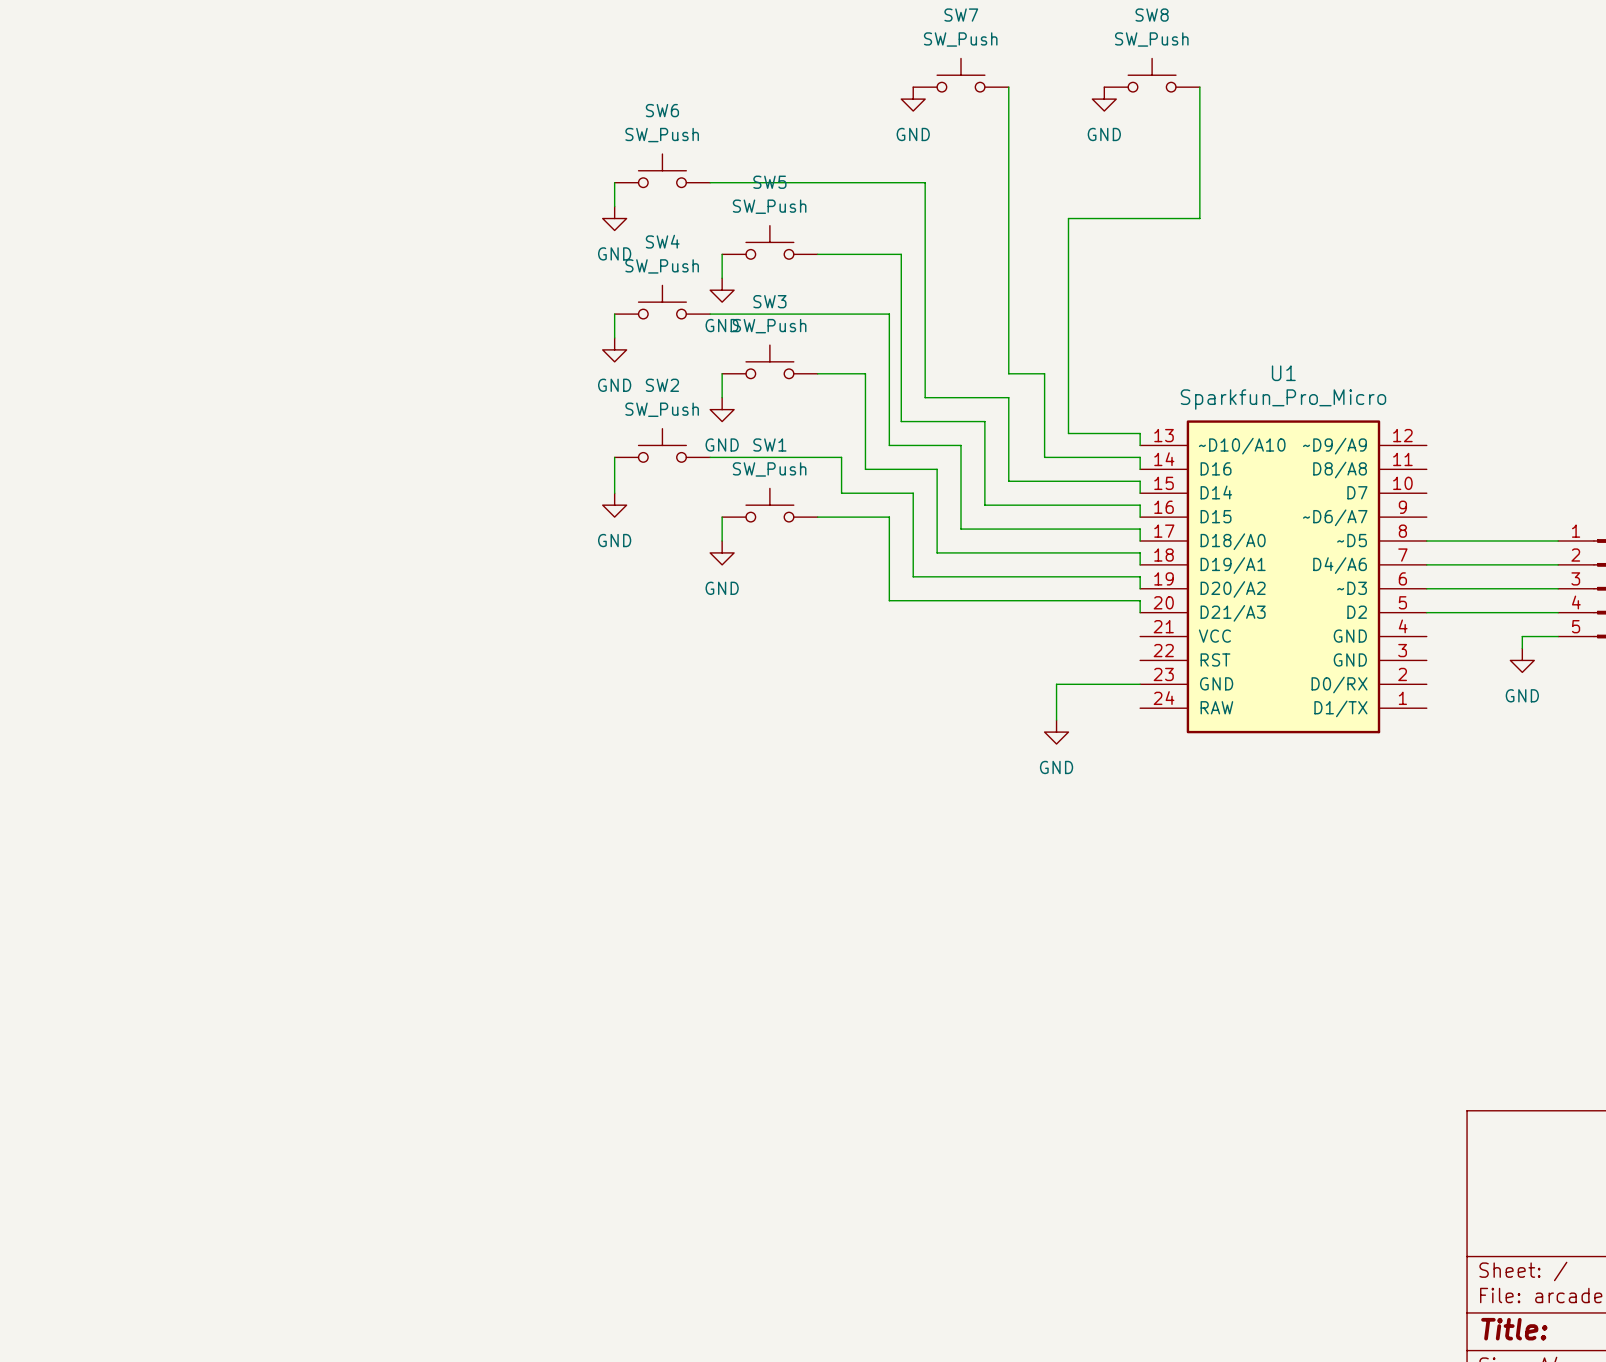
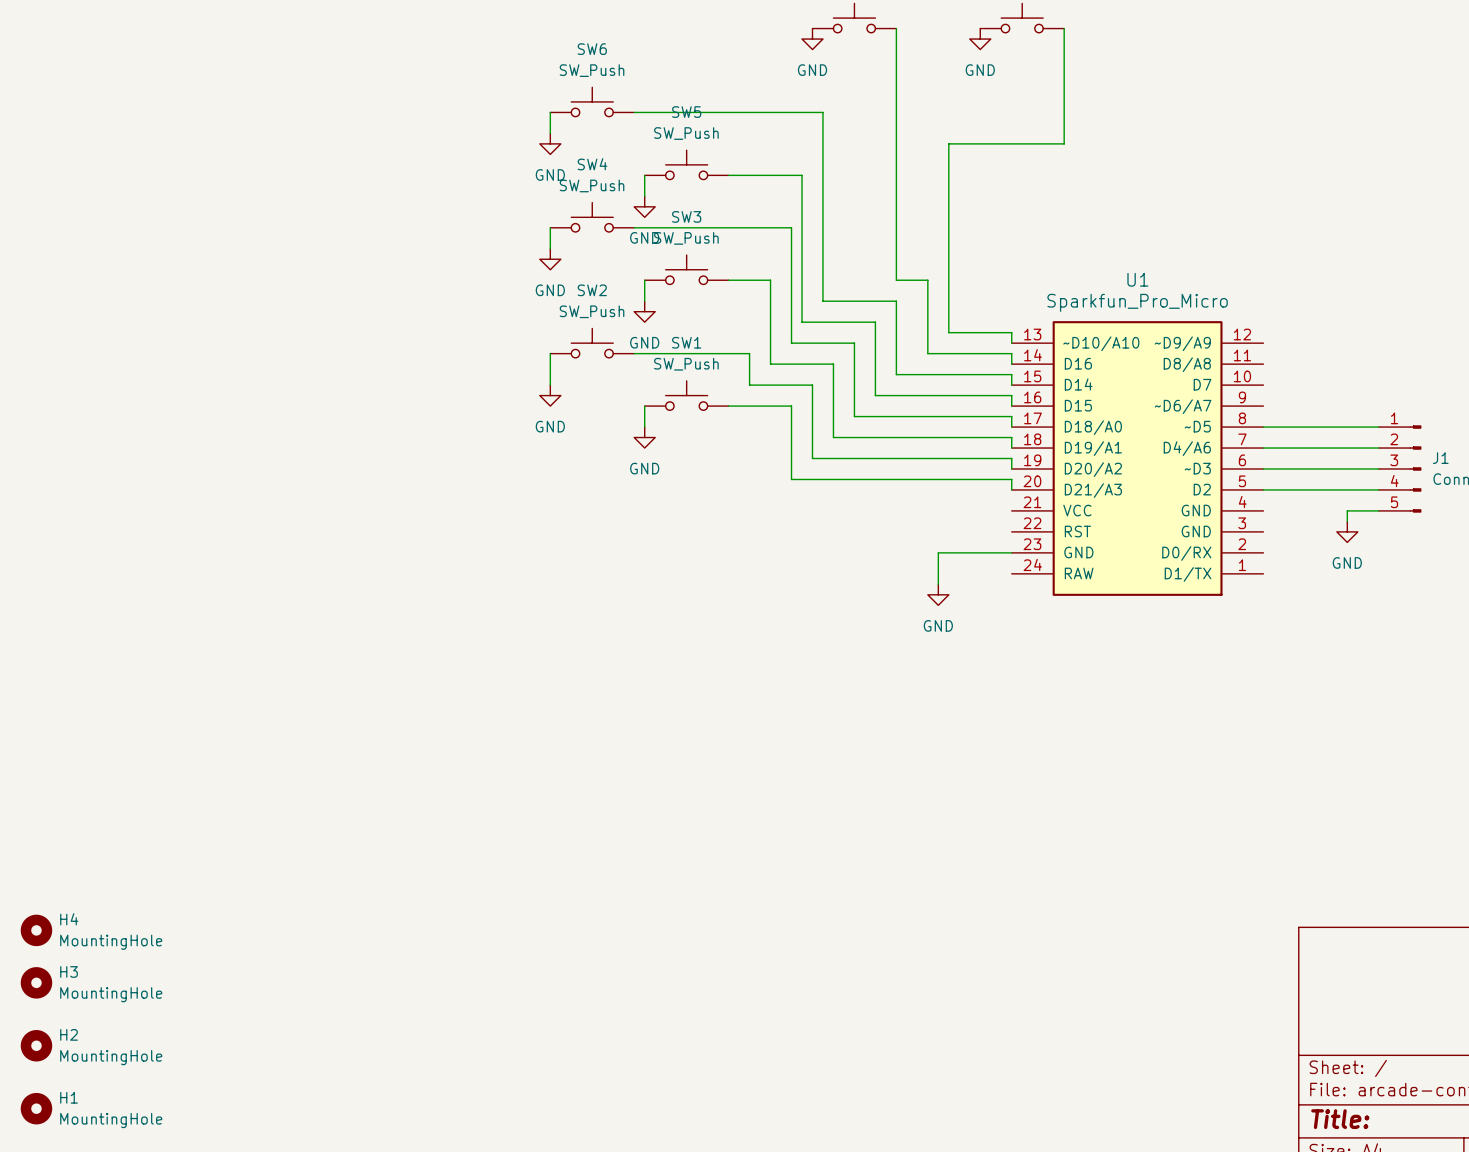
H4: none -> MountingHole (36, 930)
H3: none -> MountingHole (36, 982)
H2: none -> MountingHole (36, 1045)
H1: none -> MountingHole (36, 1108)

